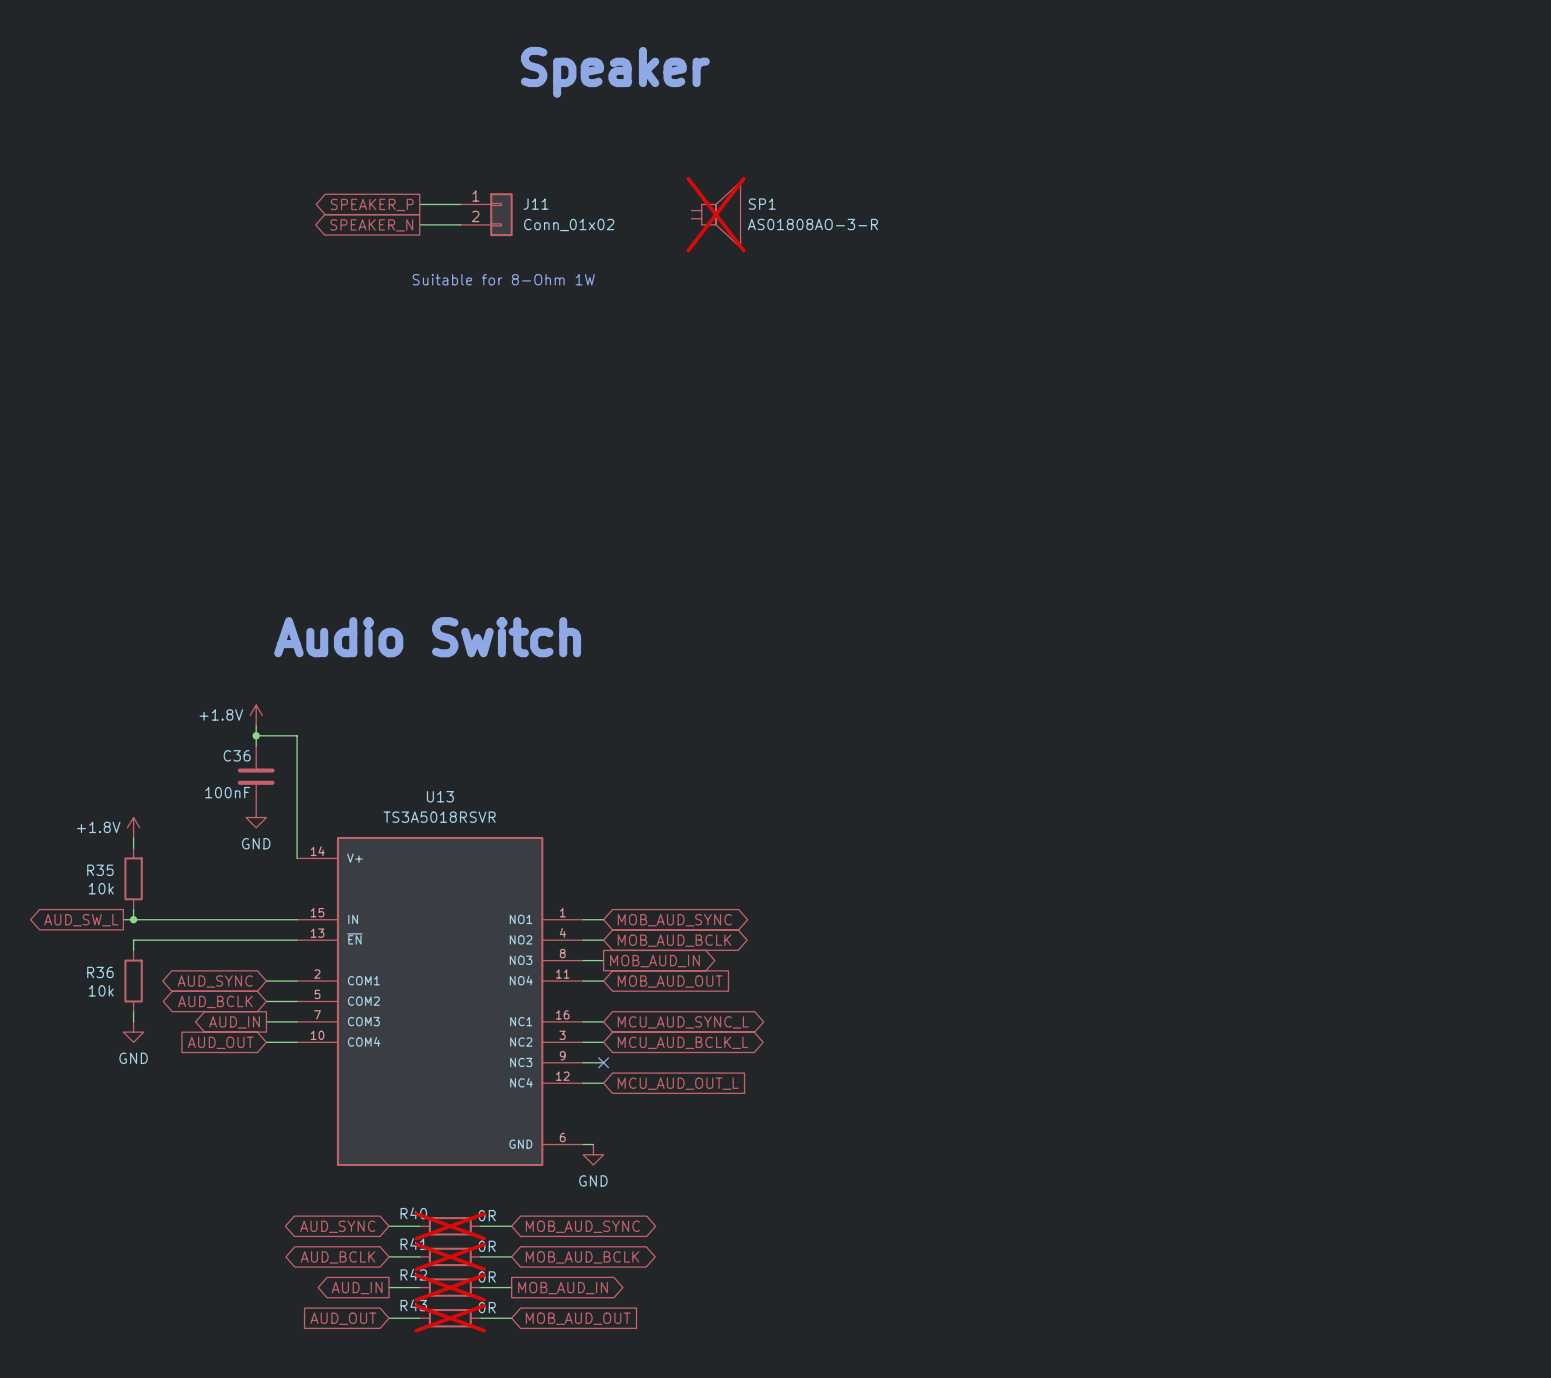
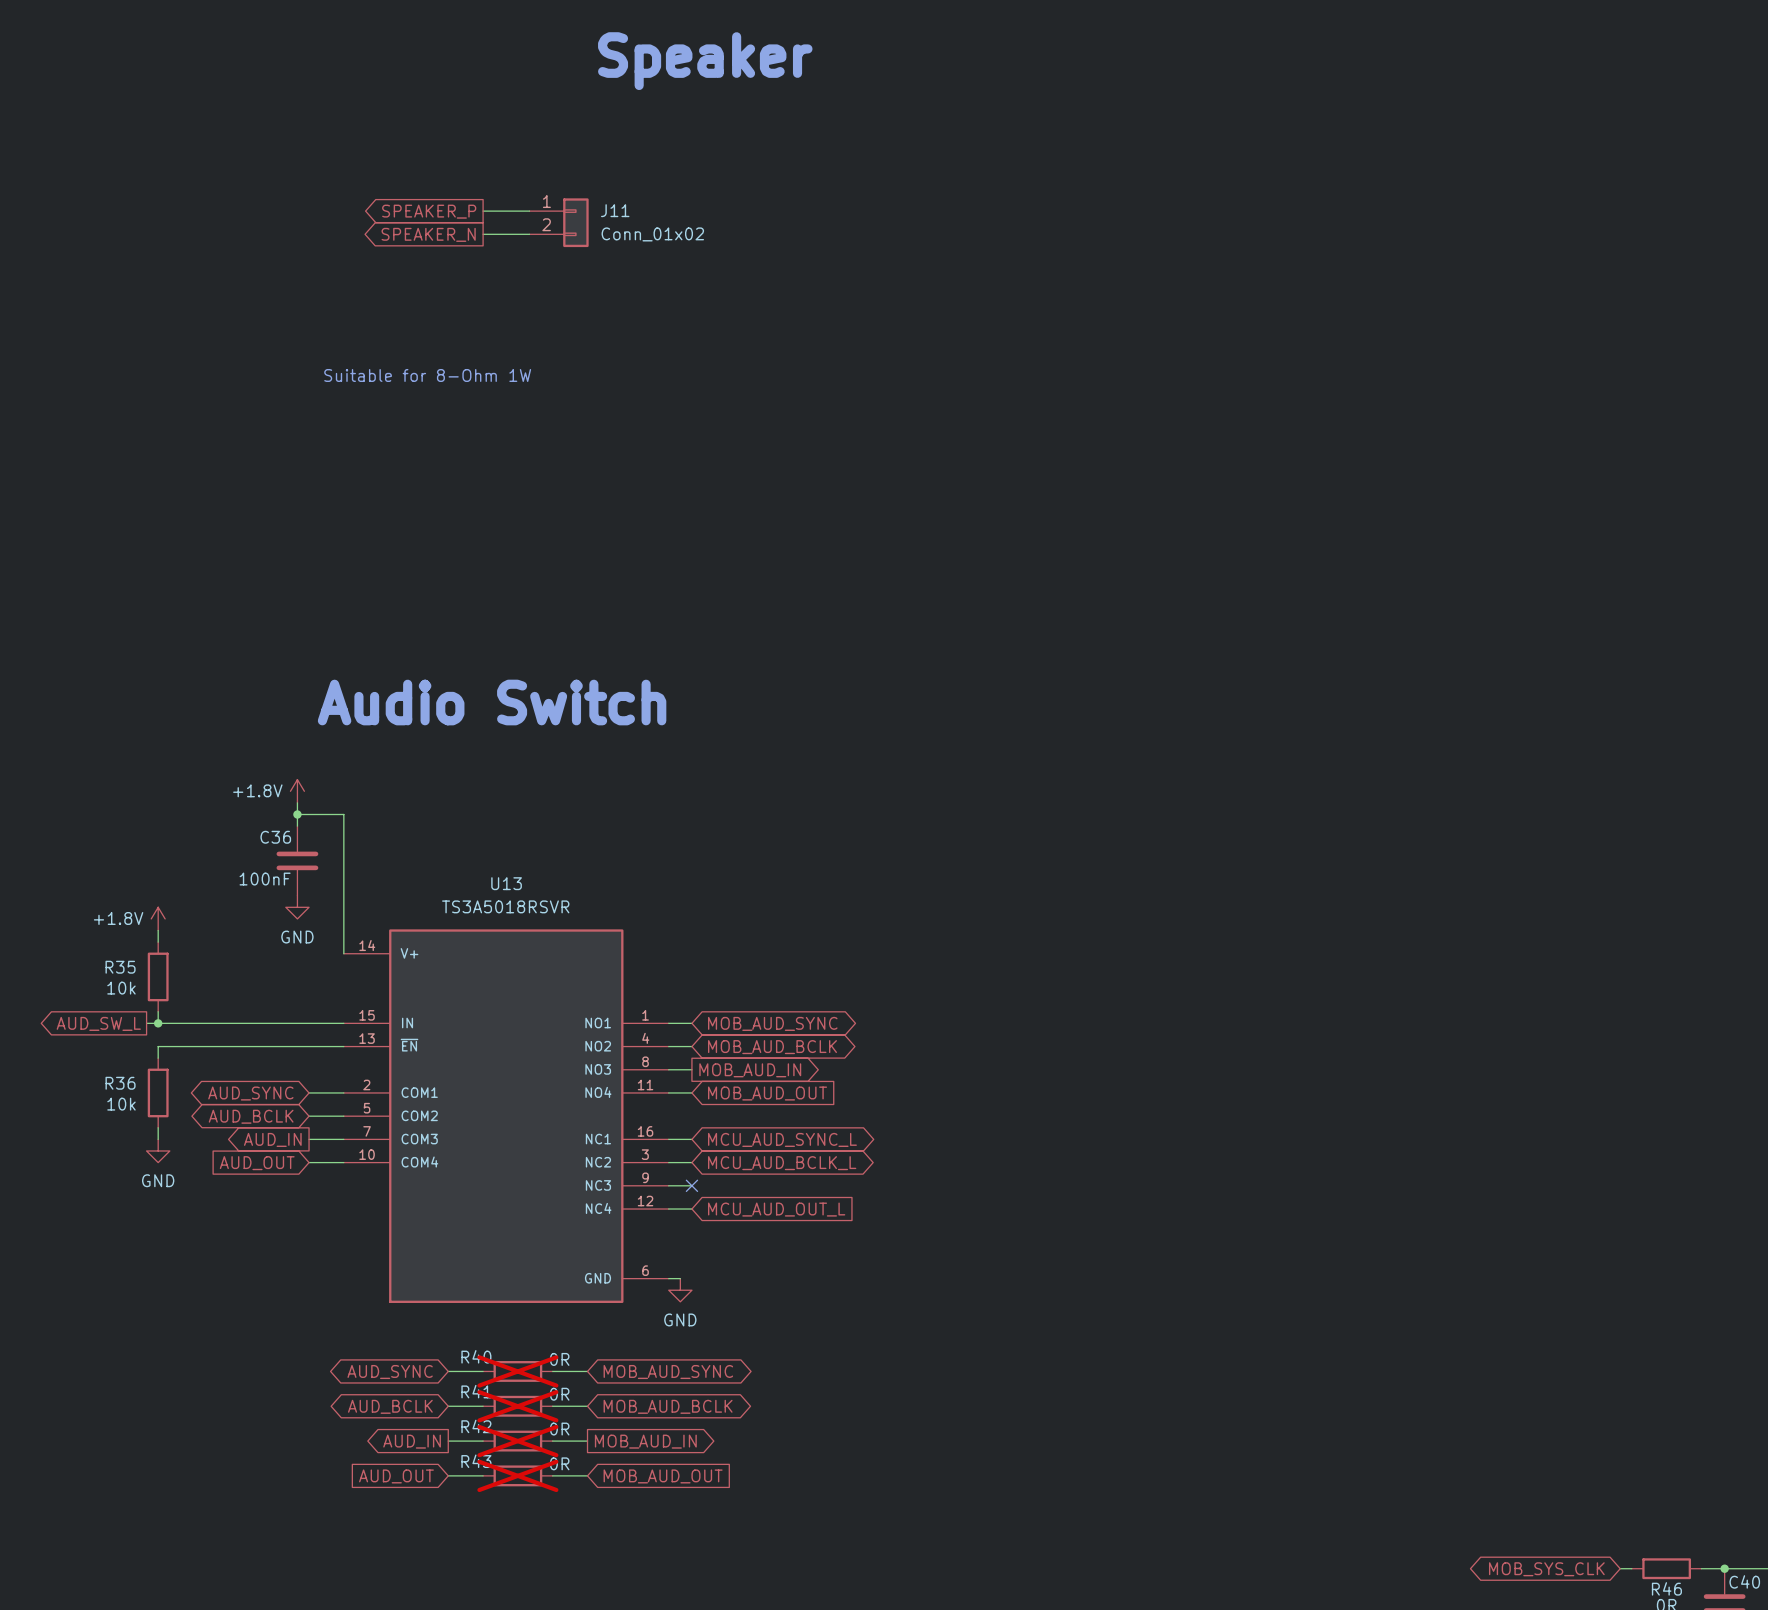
SP1: AS01808AO-3-R (716, 214) -> none
text position: Suitable for 8-Ohm 1W (503, 279) -> Suitable for 8-Ohm 1W (427, 375)

